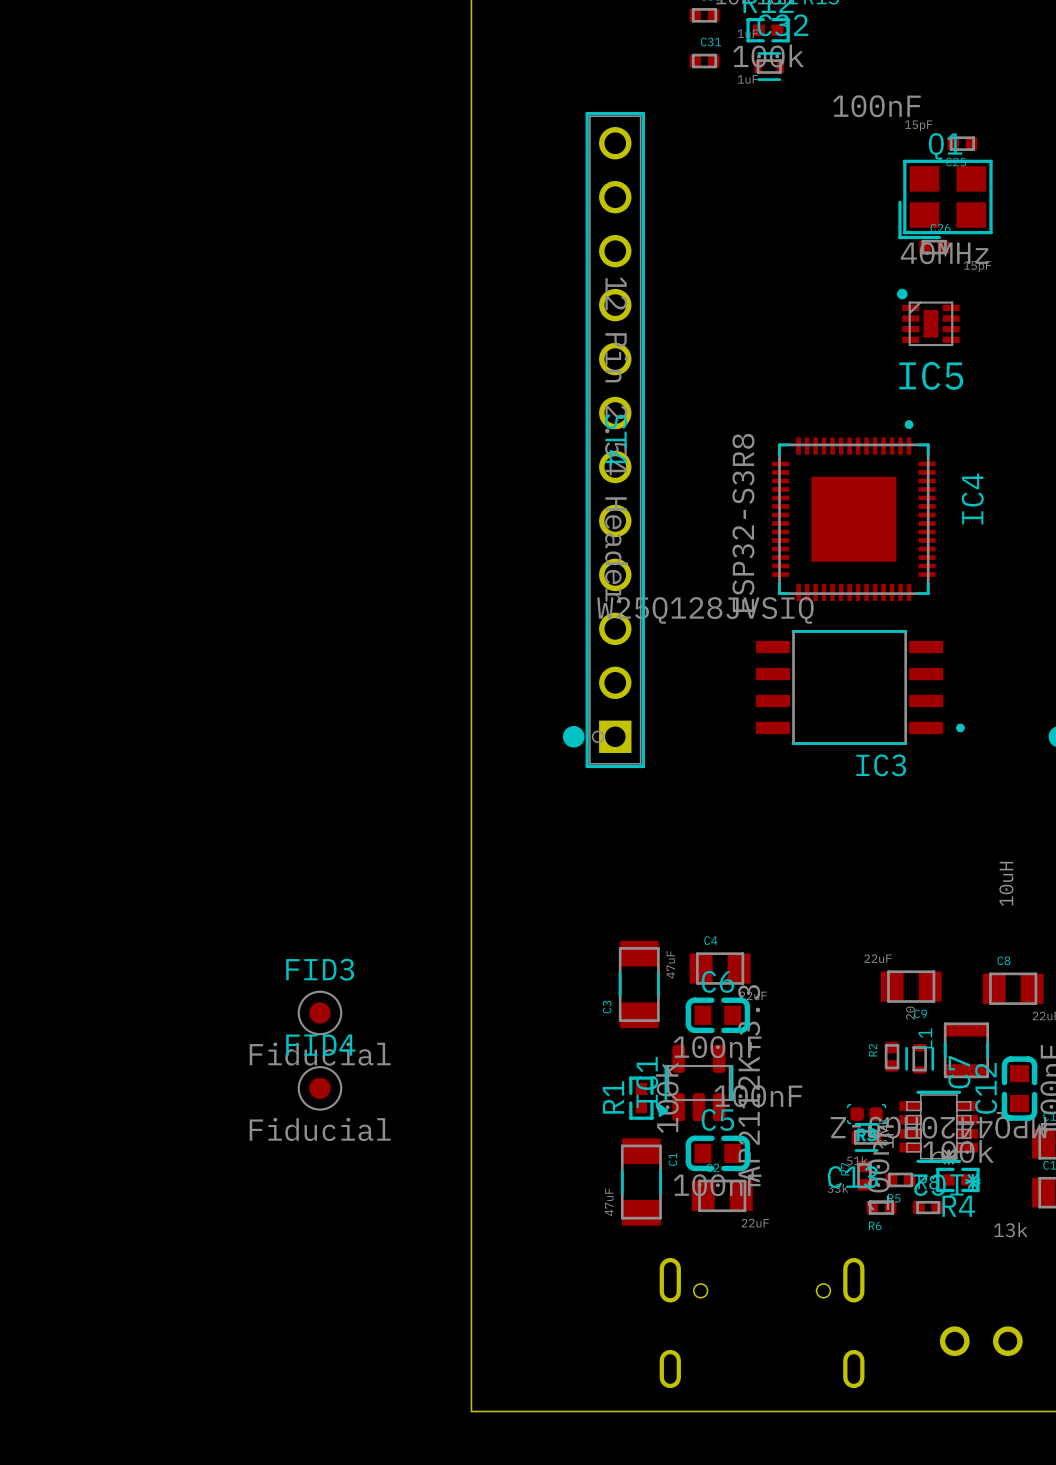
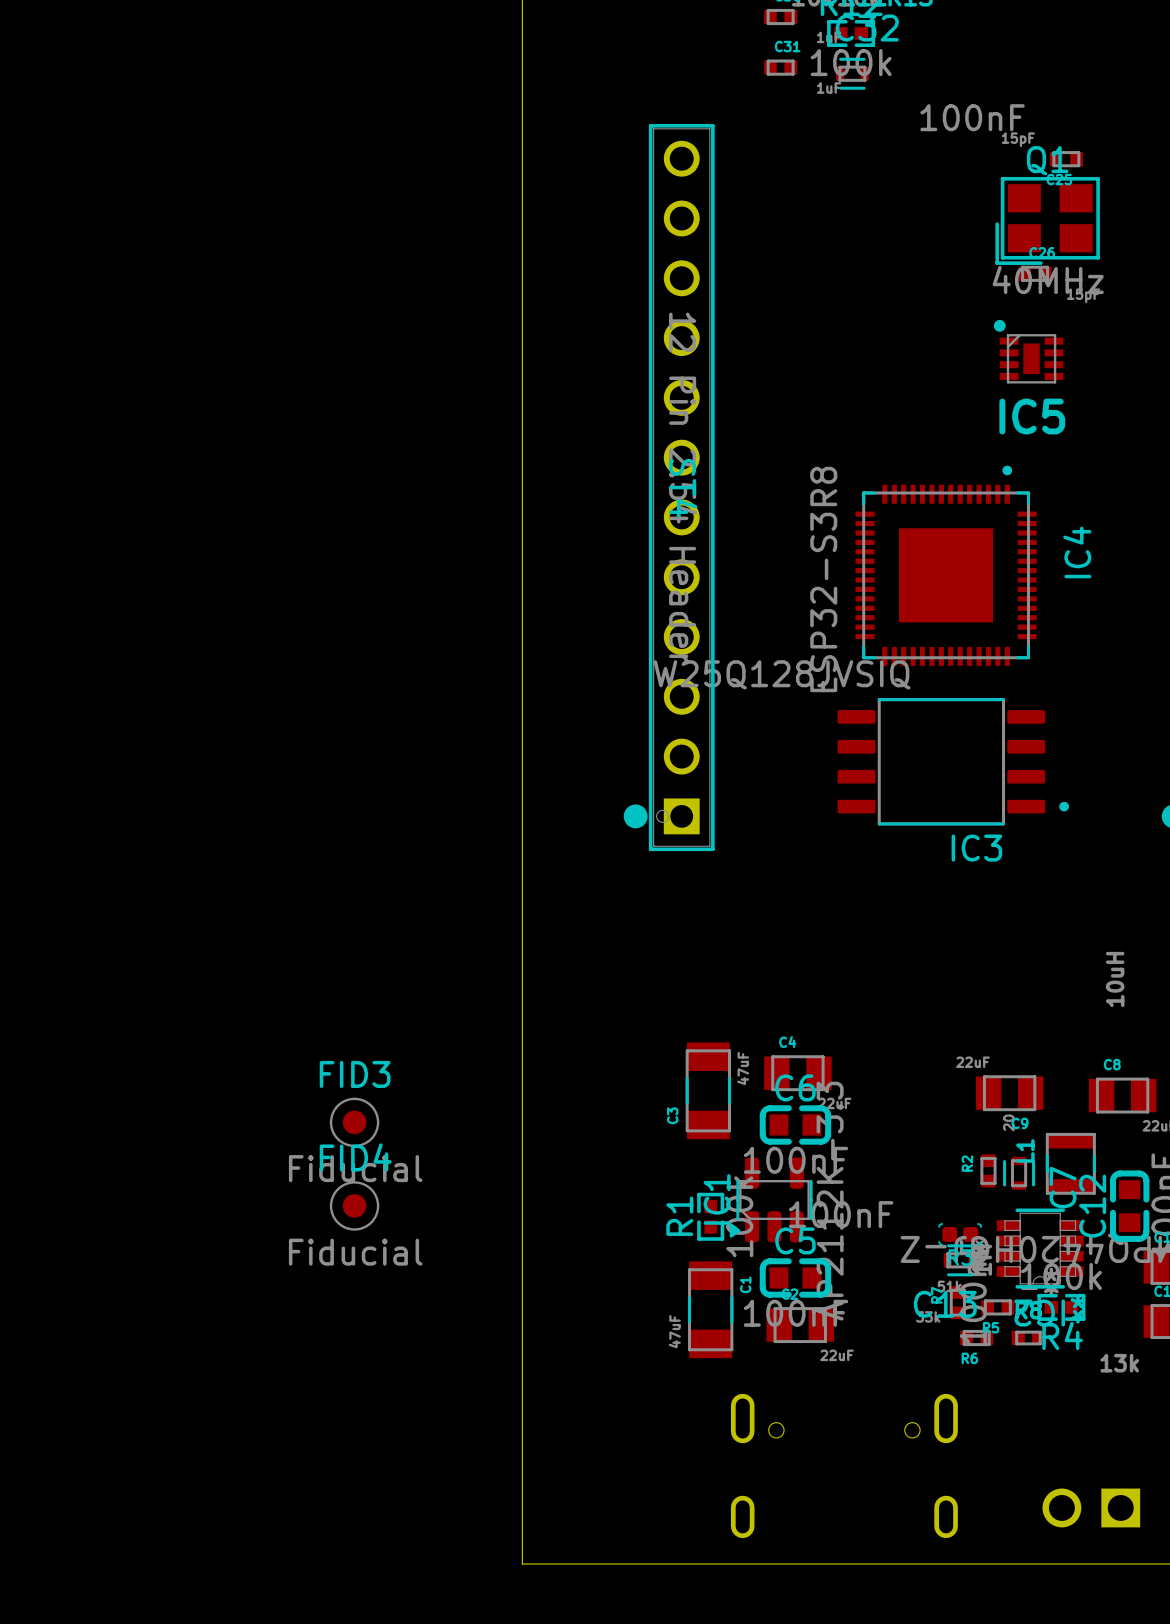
part footprint: [939, 1326, 1023, 1357] -> [1042, 1488, 1141, 1528]

